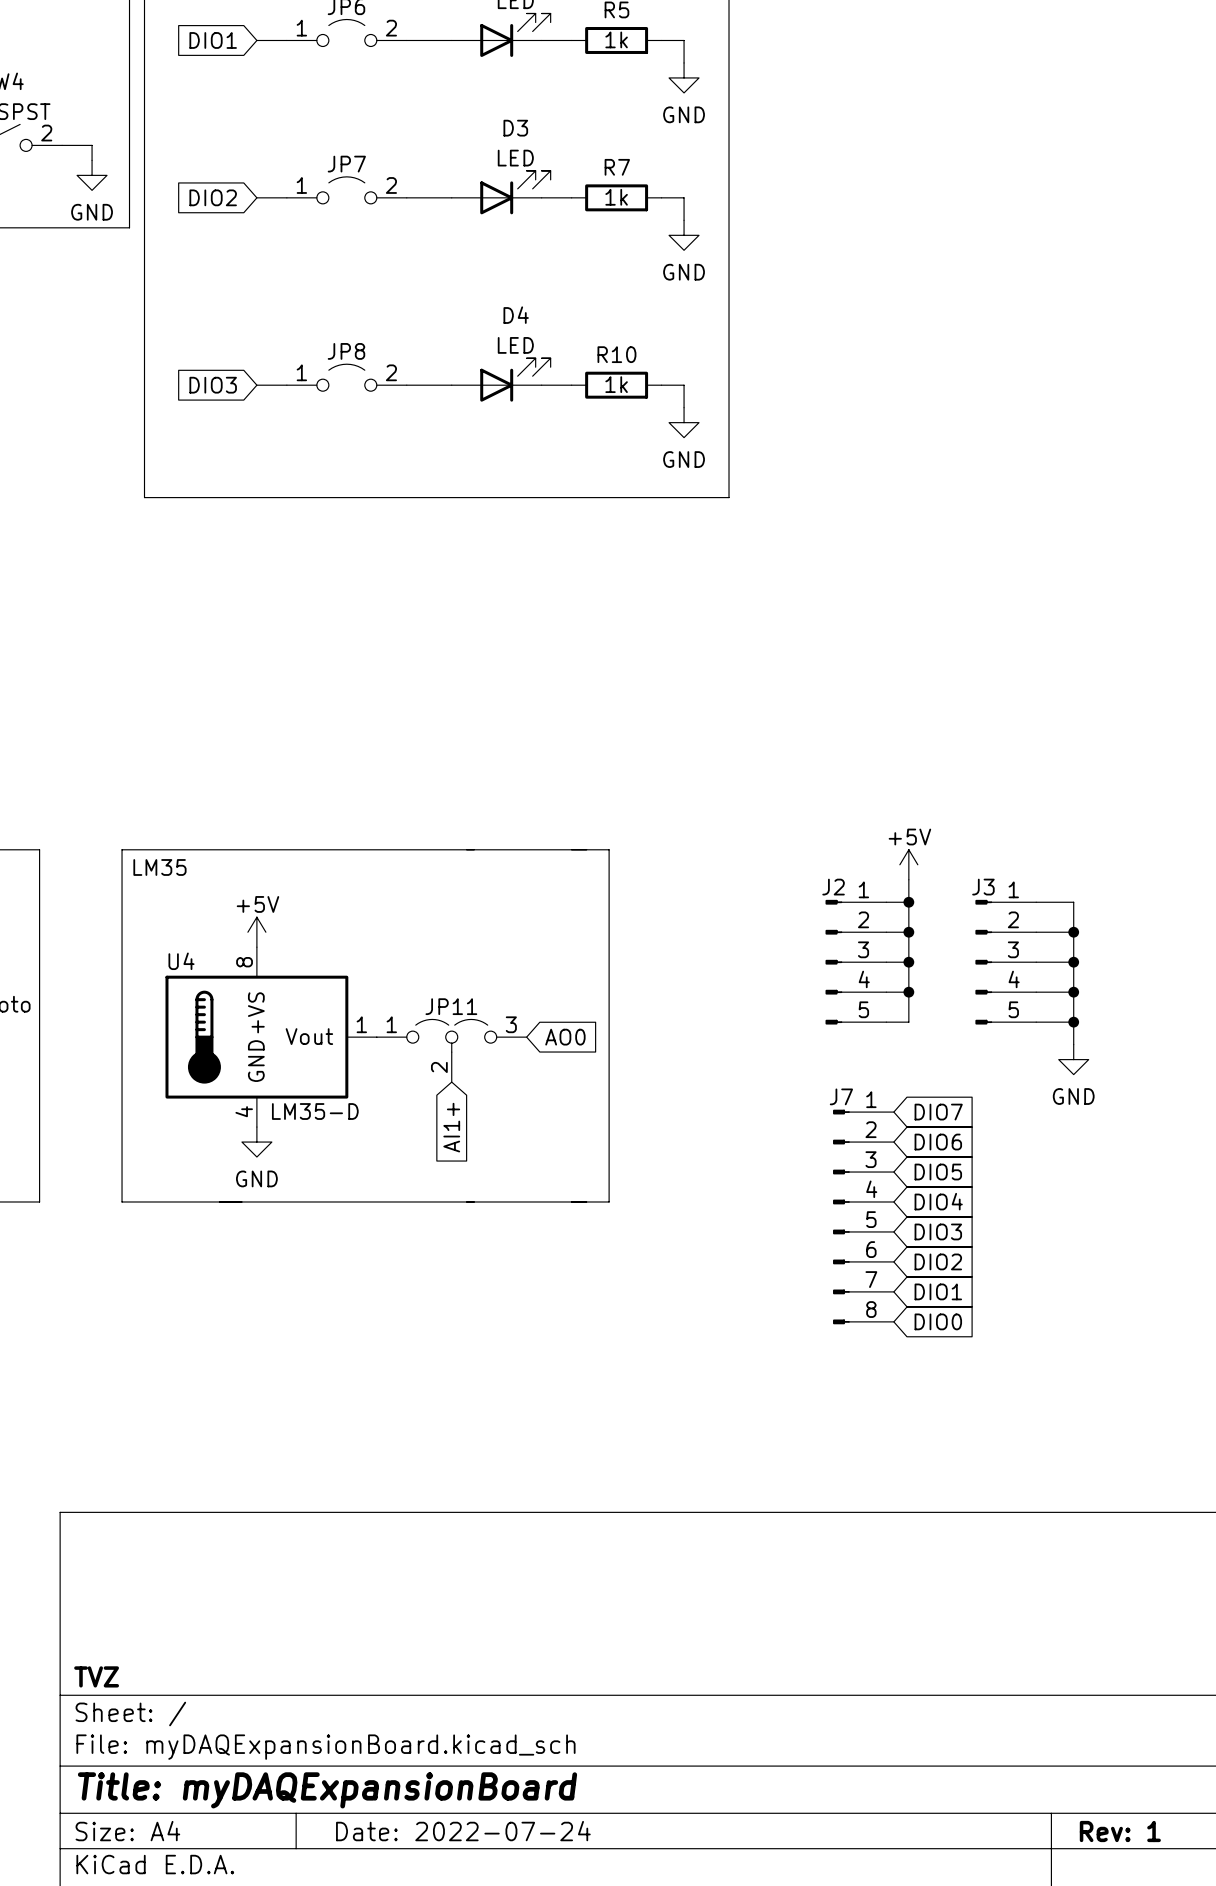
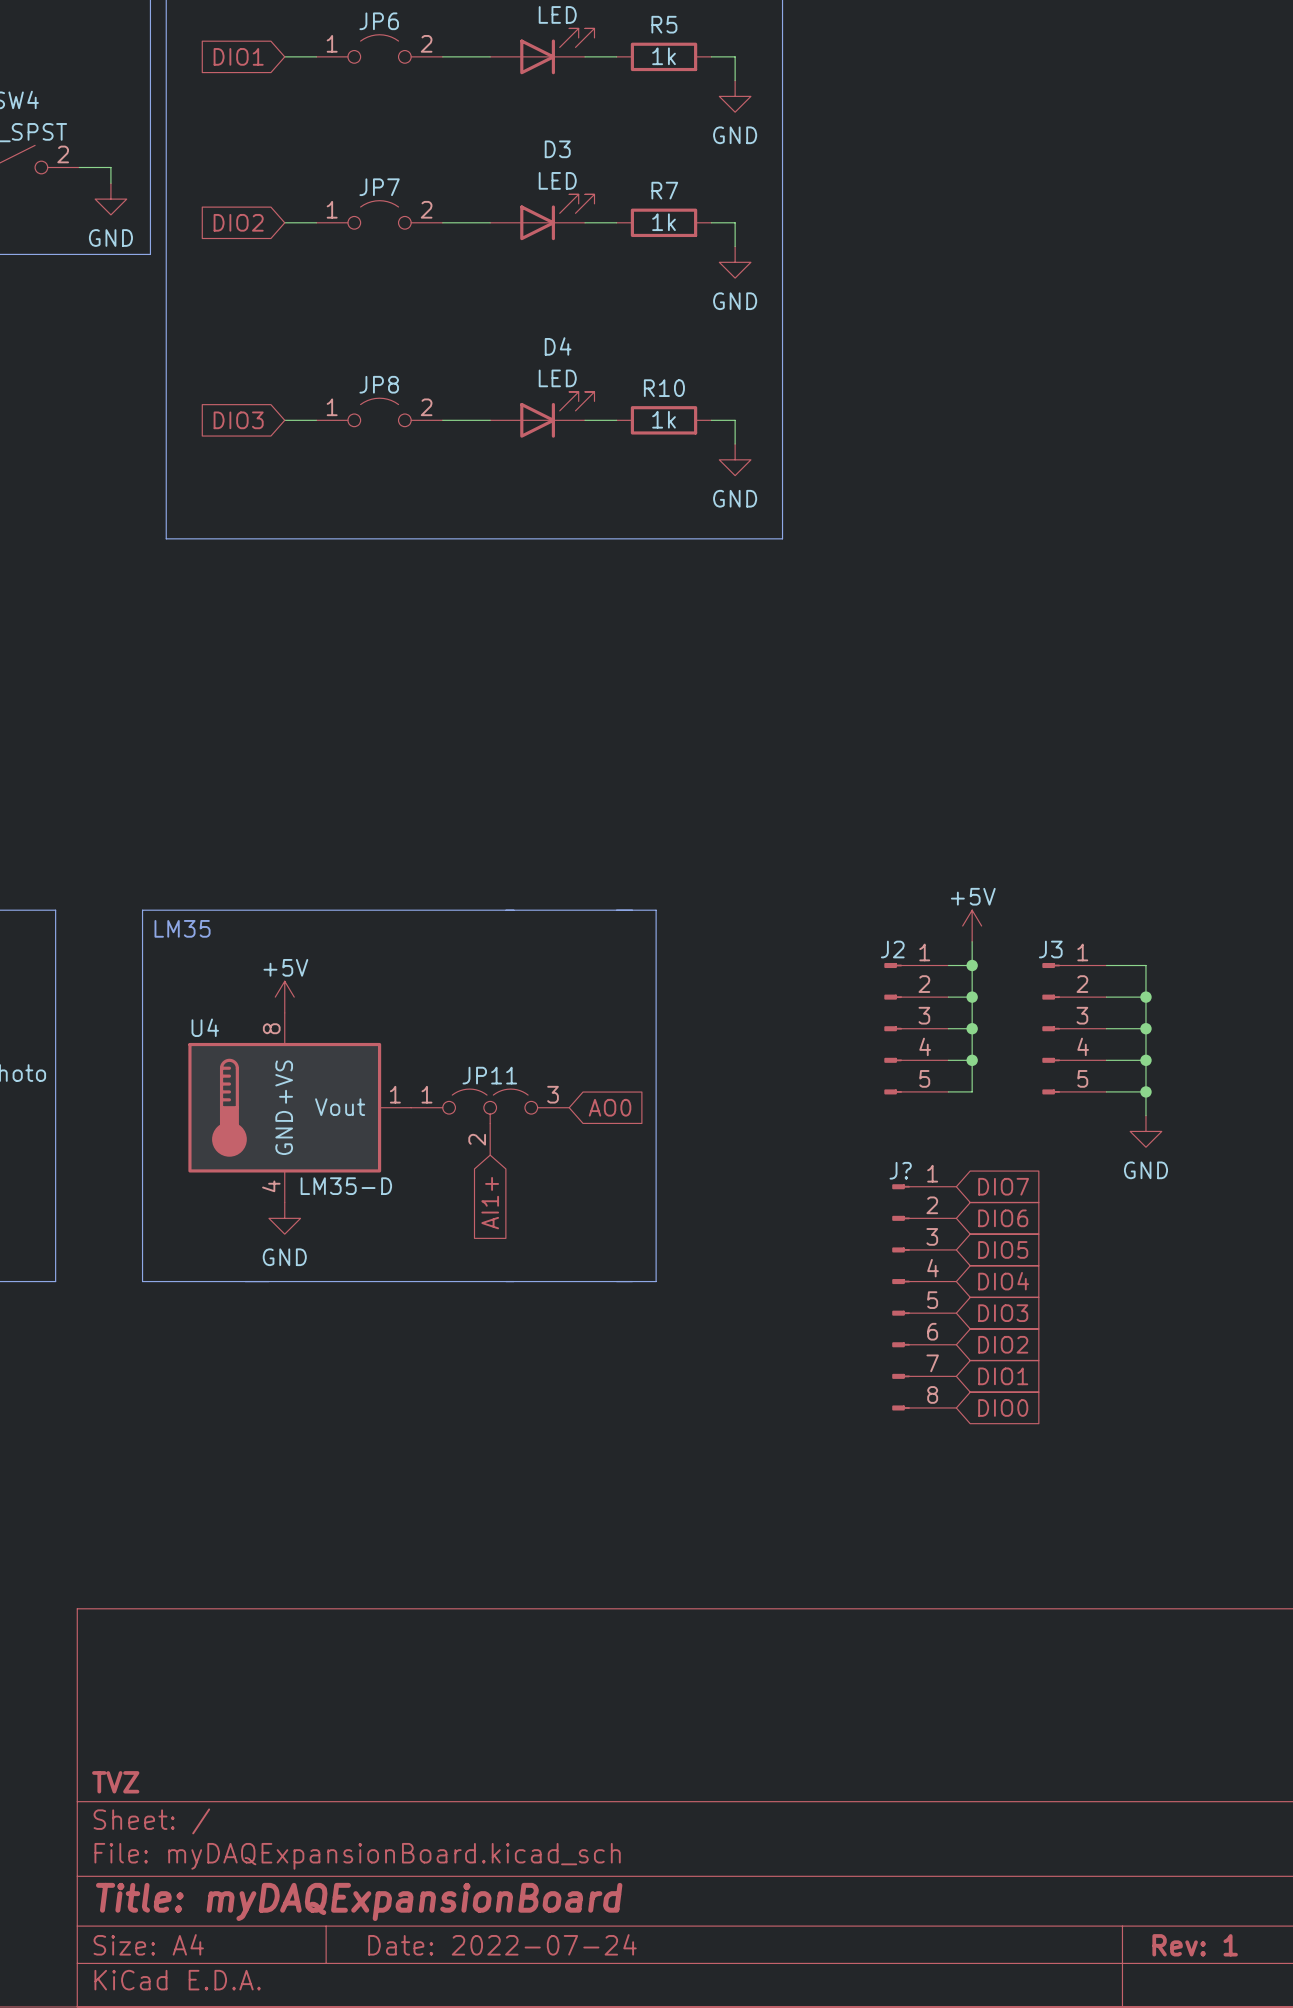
J7 name: J7 (841, 1096) -> J? (900, 1170)

